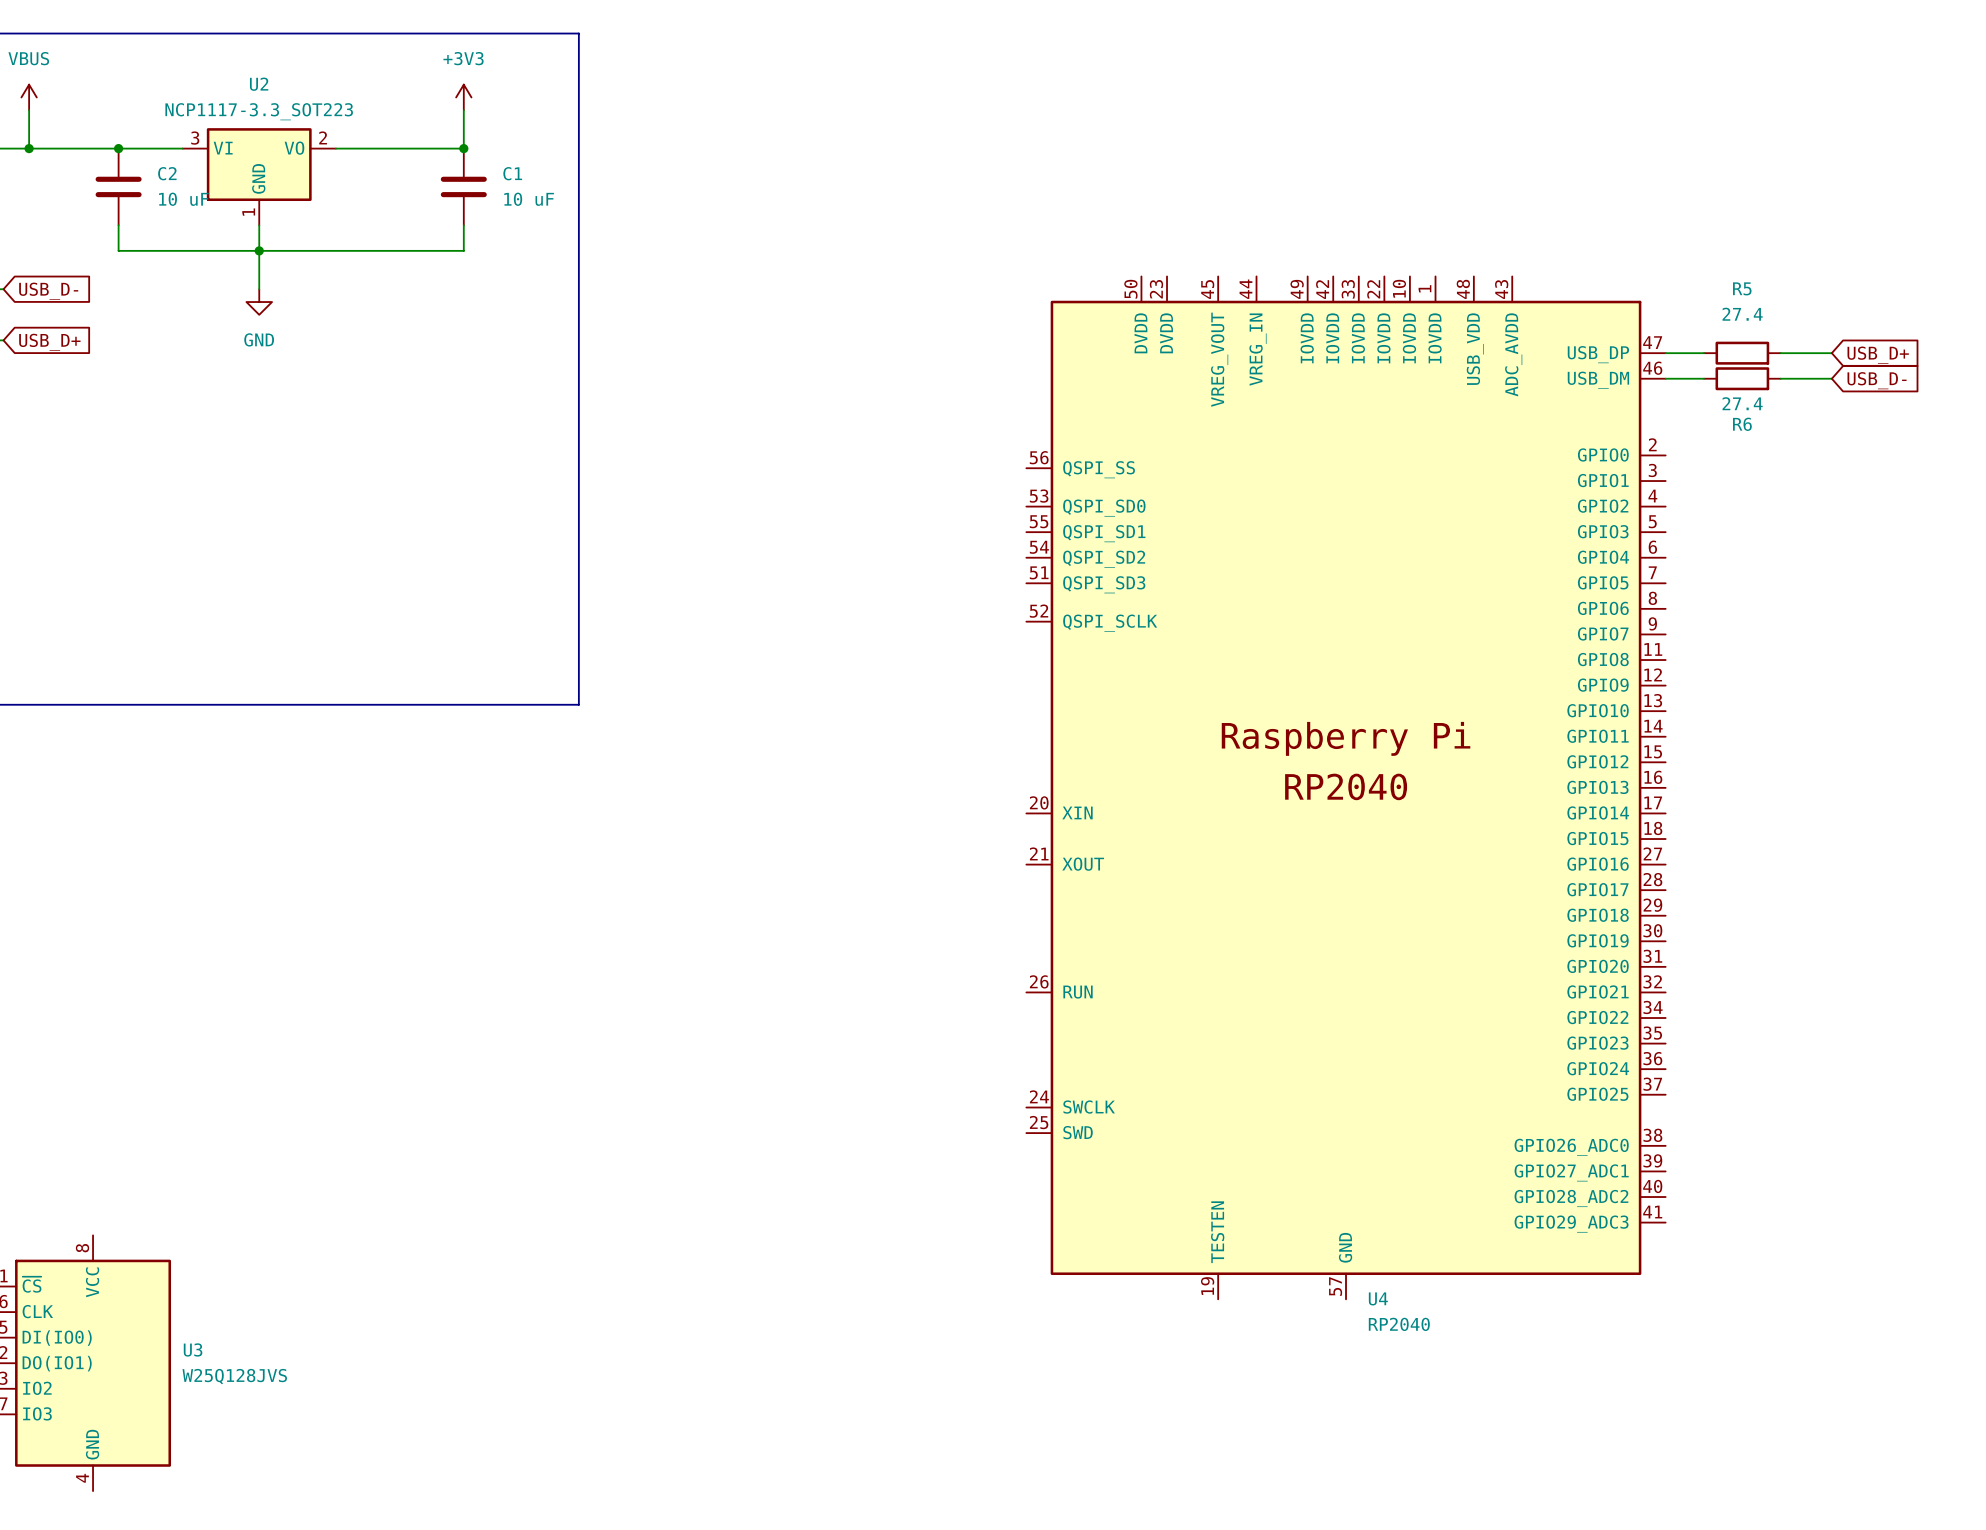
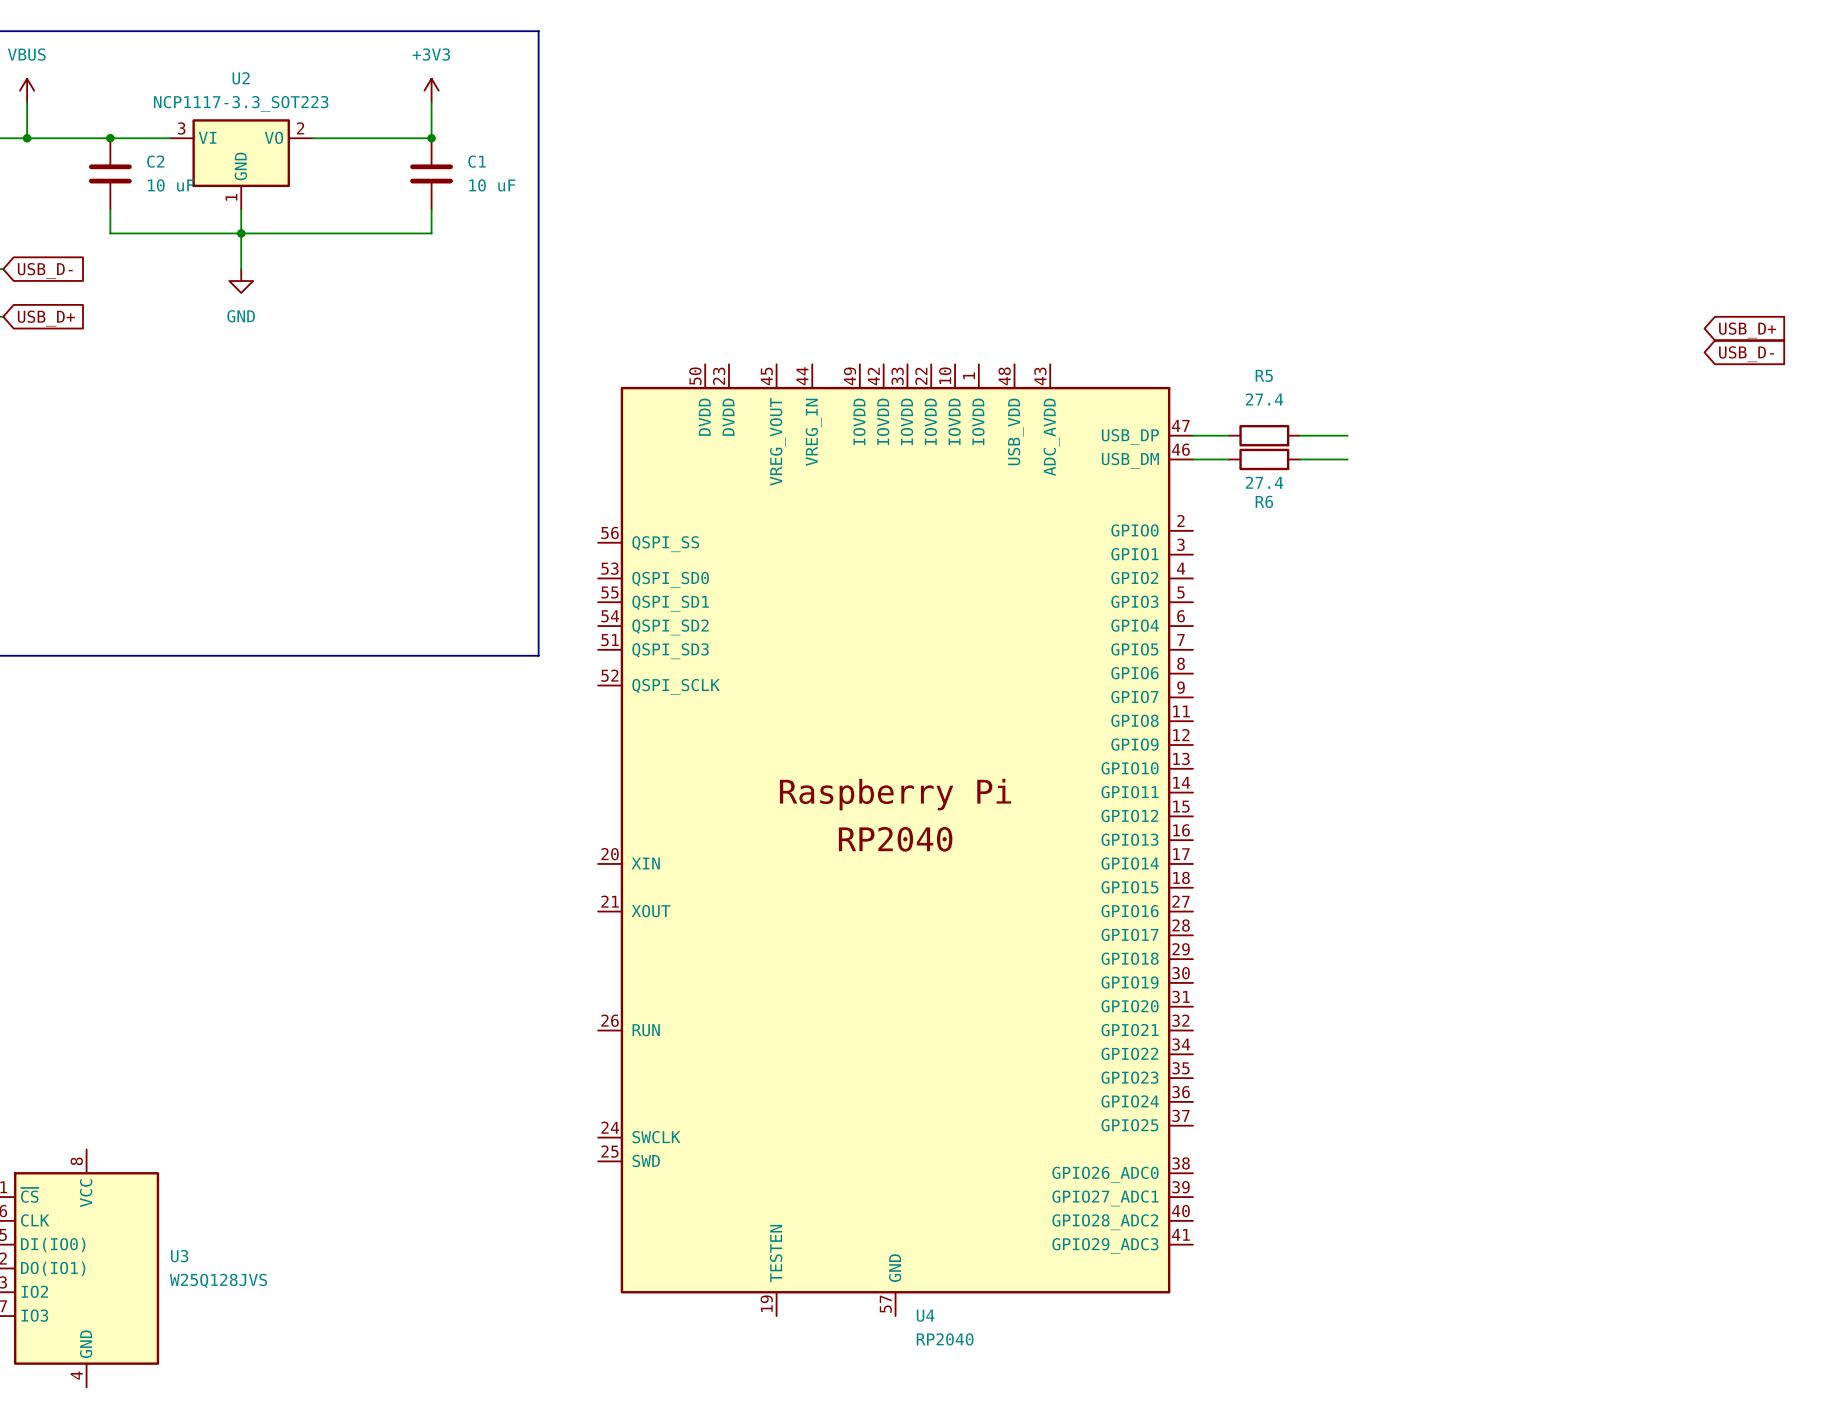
wire: (1665, 353) (1704, 353) -> none
R5 position: (1742, 353) -> (1264, 435)
wire: (1780, 353) (1831, 353) -> none
wire: (1665, 378) (1704, 378) -> none
R6 position: (1742, 378) -> (1264, 459)
wire: (1780, 378) (1831, 378) -> none
U4 position: (1346, 787) -> (895, 840)

